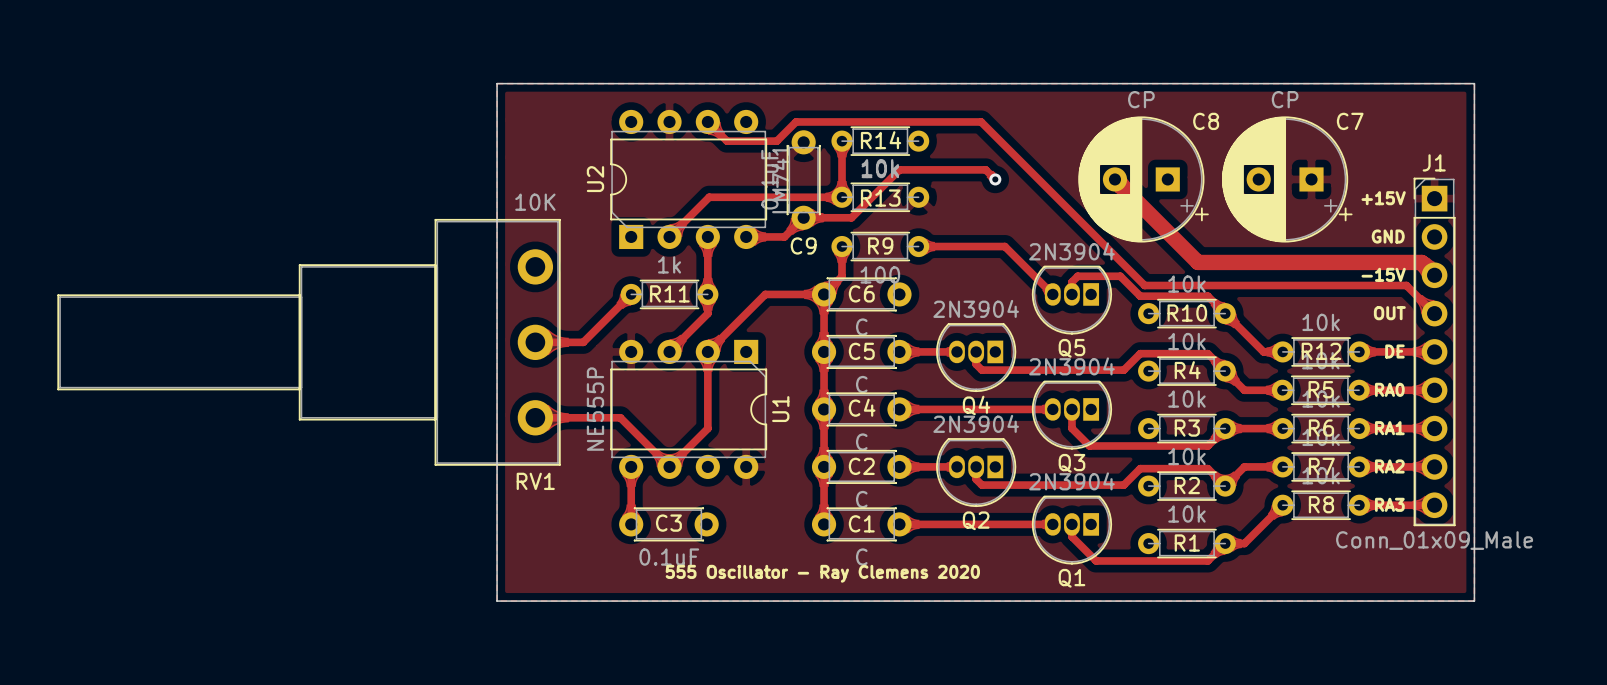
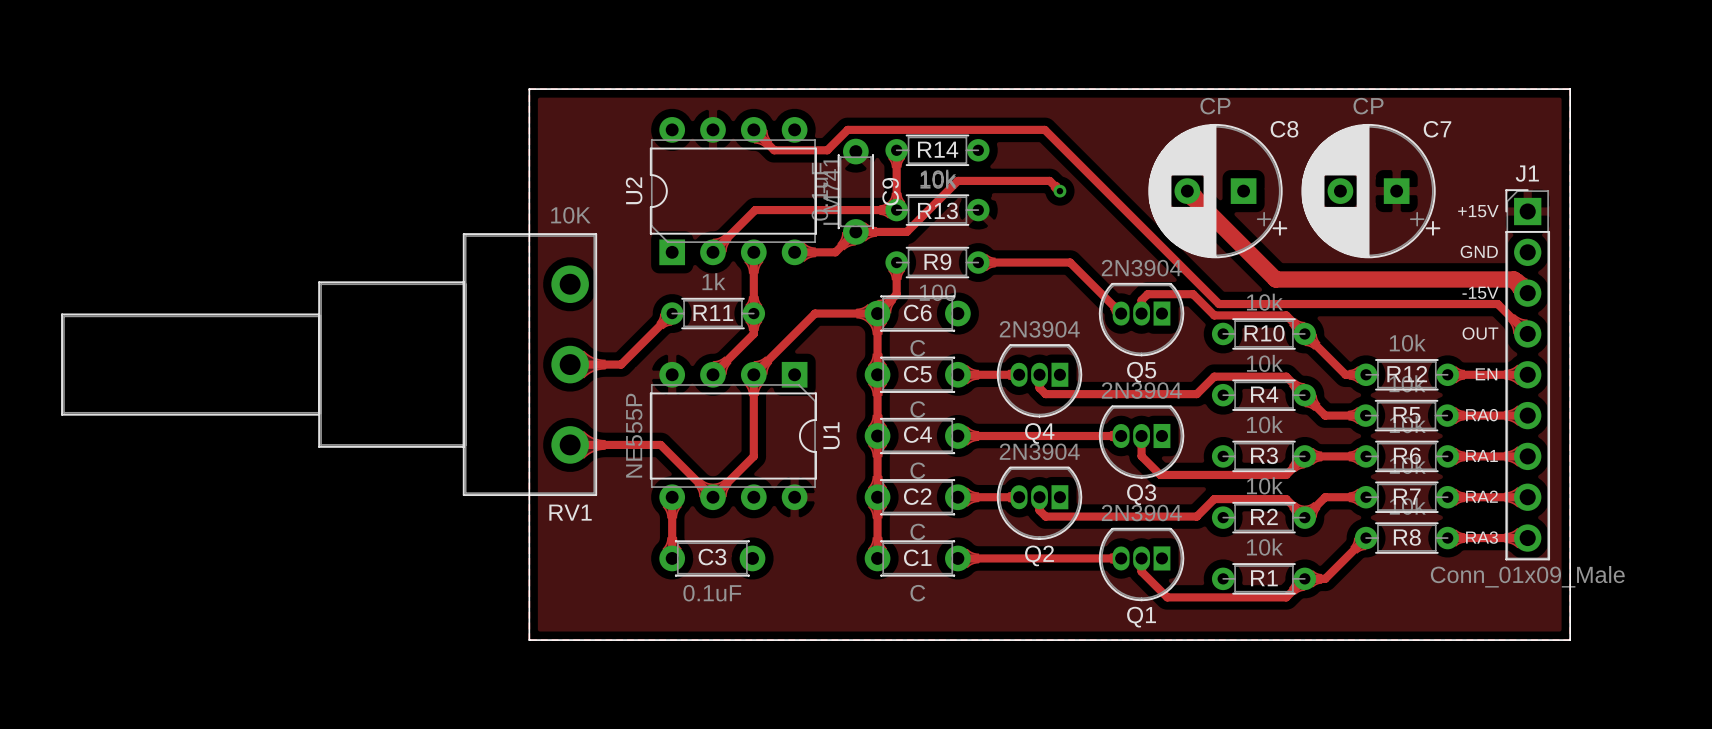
C9 name rotation: 0° (803, 245) -> 90° counterclockwise (890, 191)
C9 name position: C9 (803, 245) -> C9 (890, 191)
text: DE (1394, 351) -> EN (1486, 374)
text: 555 Oscillator - Ray Clemens 2020 (822, 573) -> none

